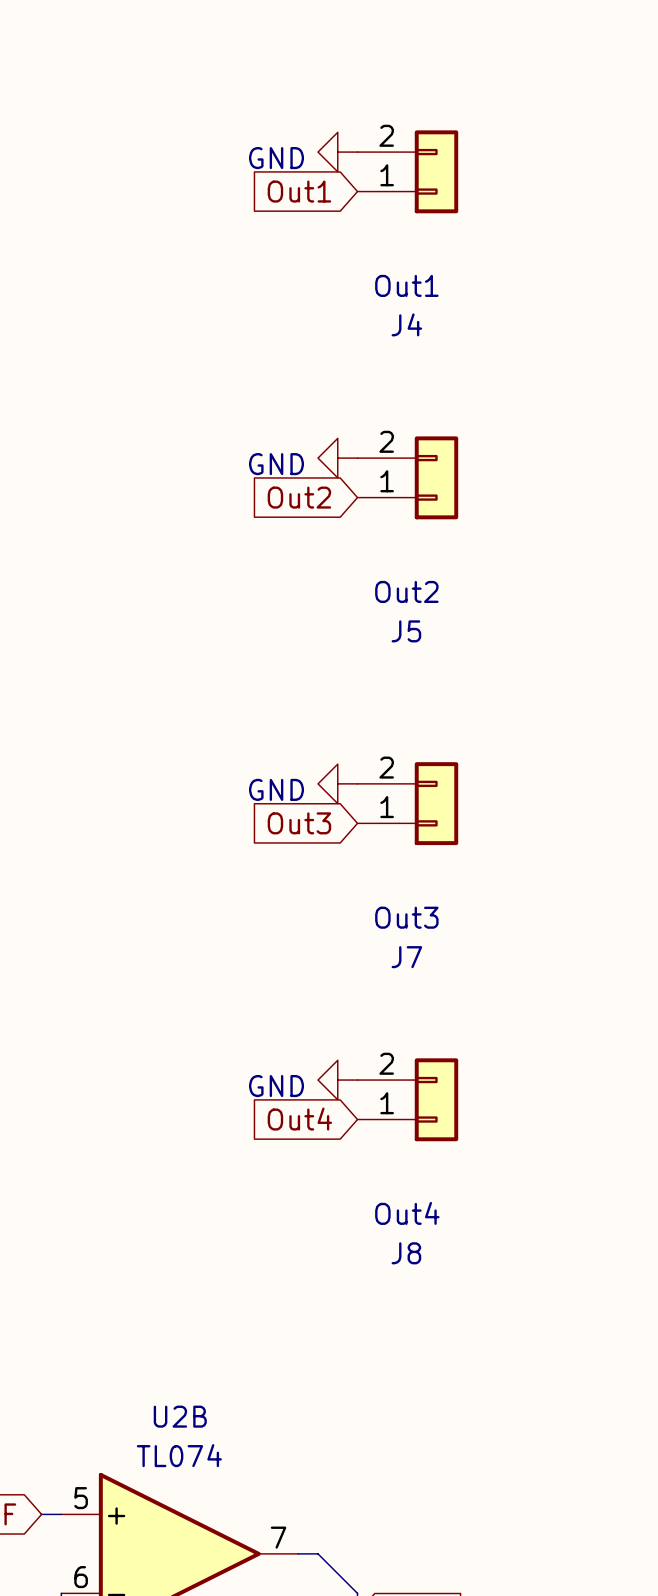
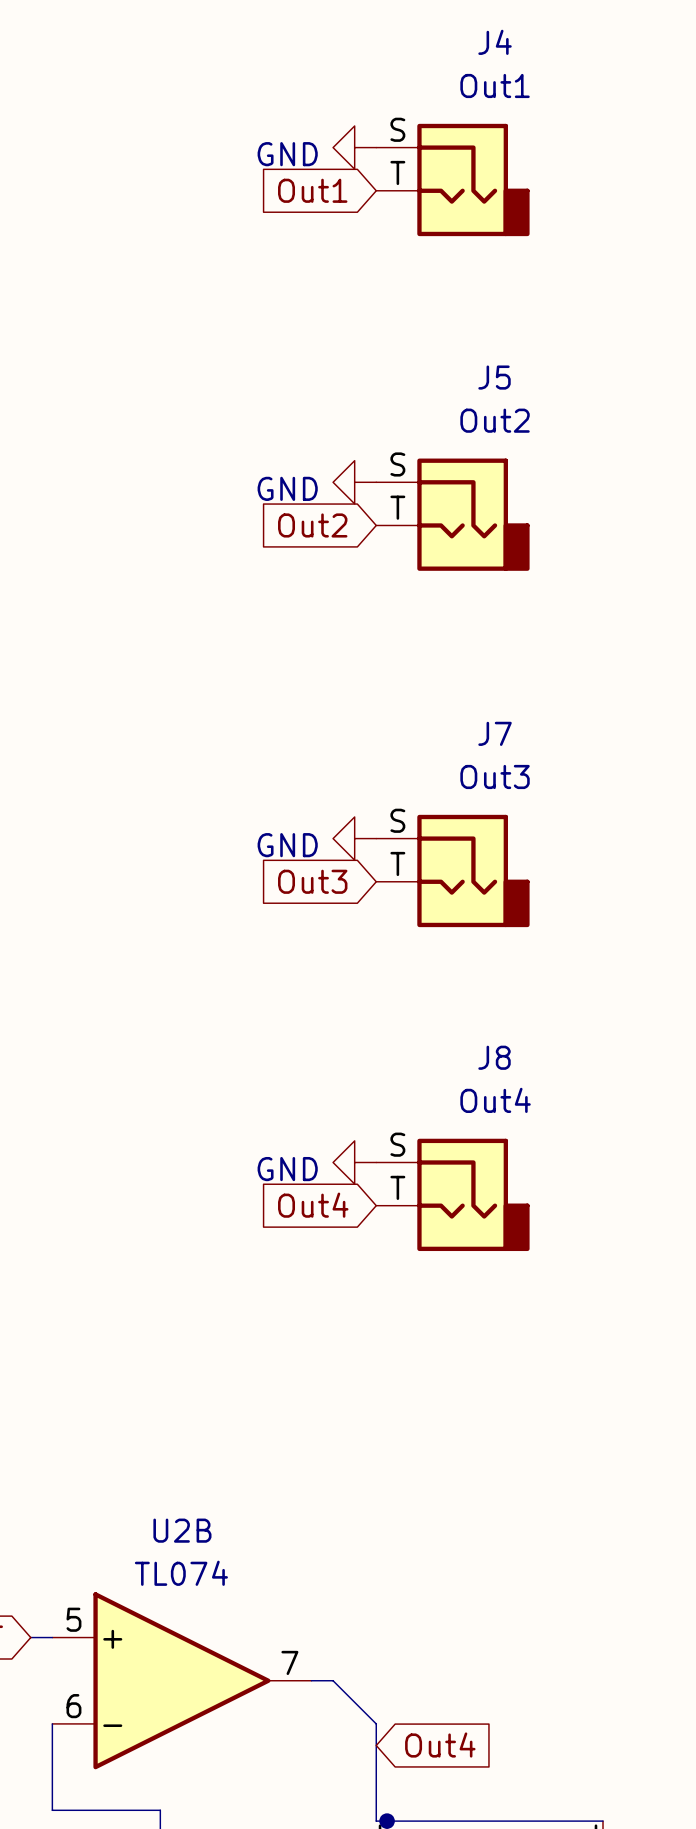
J4 symbol: [357, 130, 459, 214] -> [376, 123, 530, 237]
J4 value position: Out1 (406, 285) -> Out1 (495, 85)
J4 name position: J4 (406, 324) -> J4 (495, 42)
J5 symbol: [357, 436, 459, 520] -> [376, 458, 530, 571]
J5 value position: Out2 (406, 591) -> Out2 (495, 420)
J5 name position: J5 (406, 631) -> J5 (494, 377)
J7 symbol: [357, 762, 459, 846] -> [376, 814, 530, 928]
J7 value position: Out3 (406, 917) -> Out3 (495, 776)
J7 name position: J7 (406, 957) -> J7 (495, 733)
J8 symbol: [357, 1058, 459, 1142] -> [376, 1138, 530, 1252]
J8 value position: Out4 (407, 1213) -> Out4 (495, 1100)
J8 name position: J8 (406, 1253) -> J8 (494, 1057)

